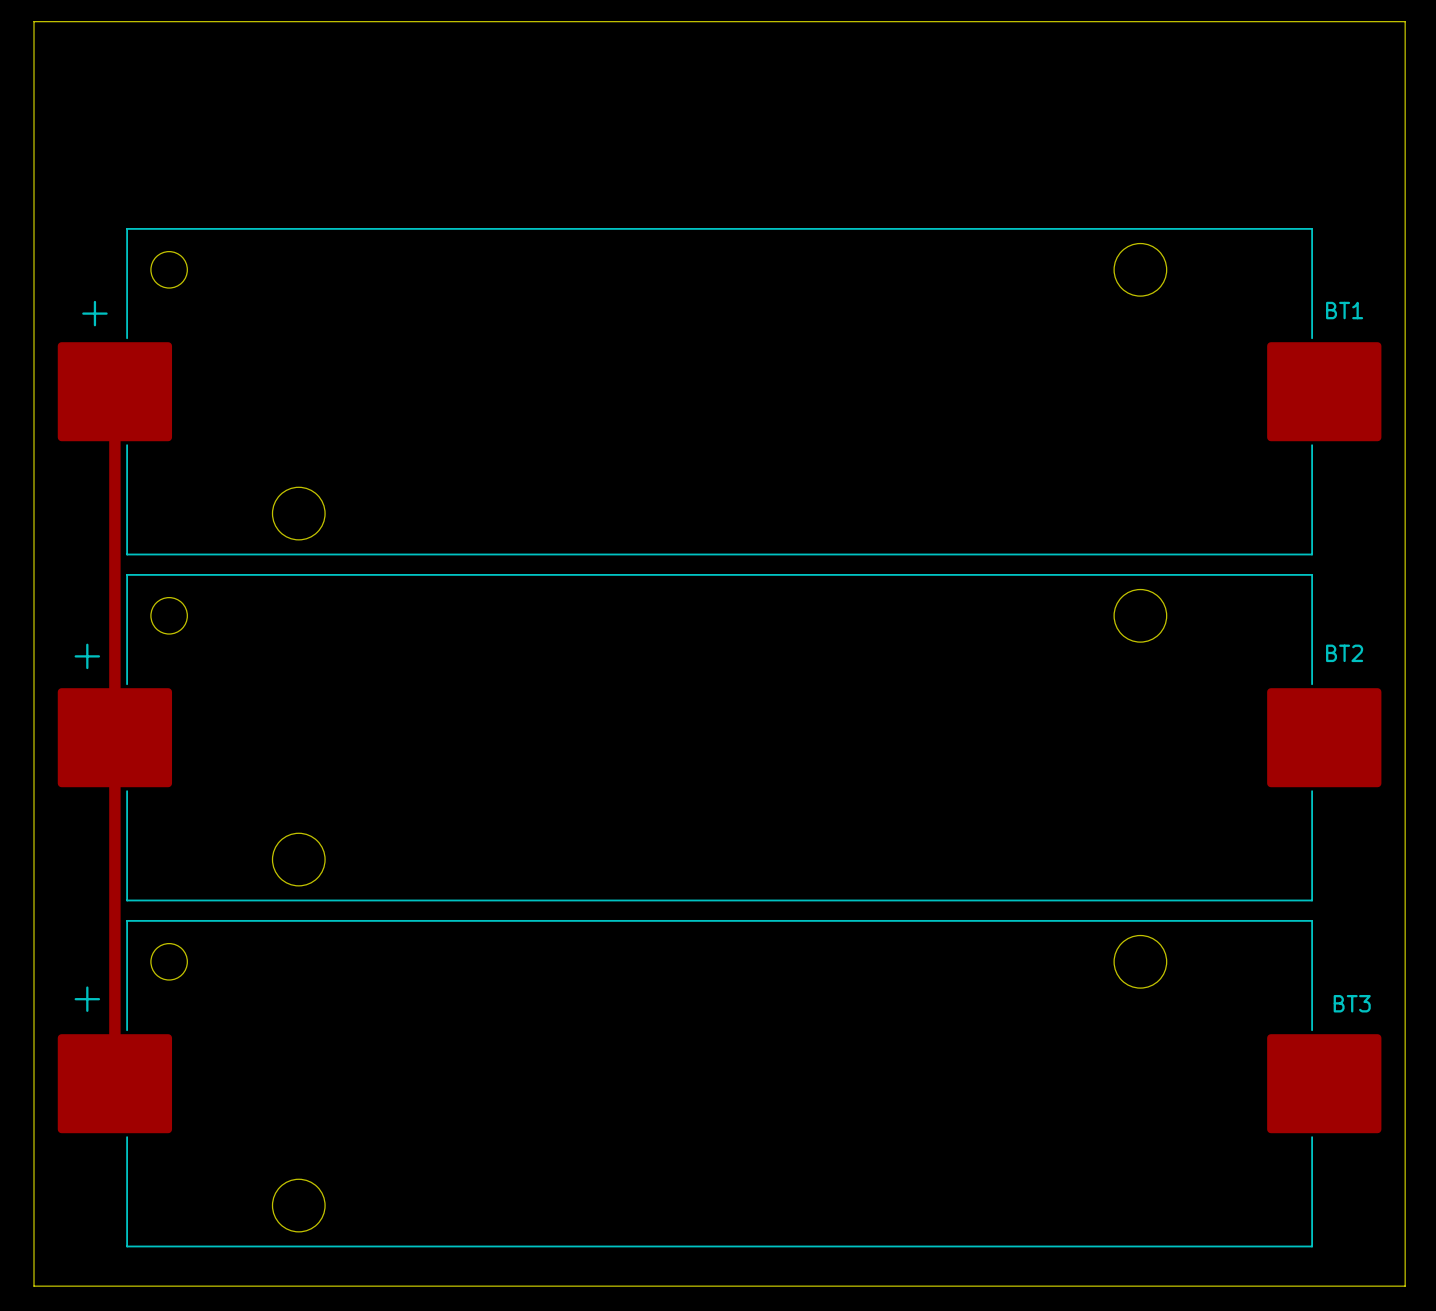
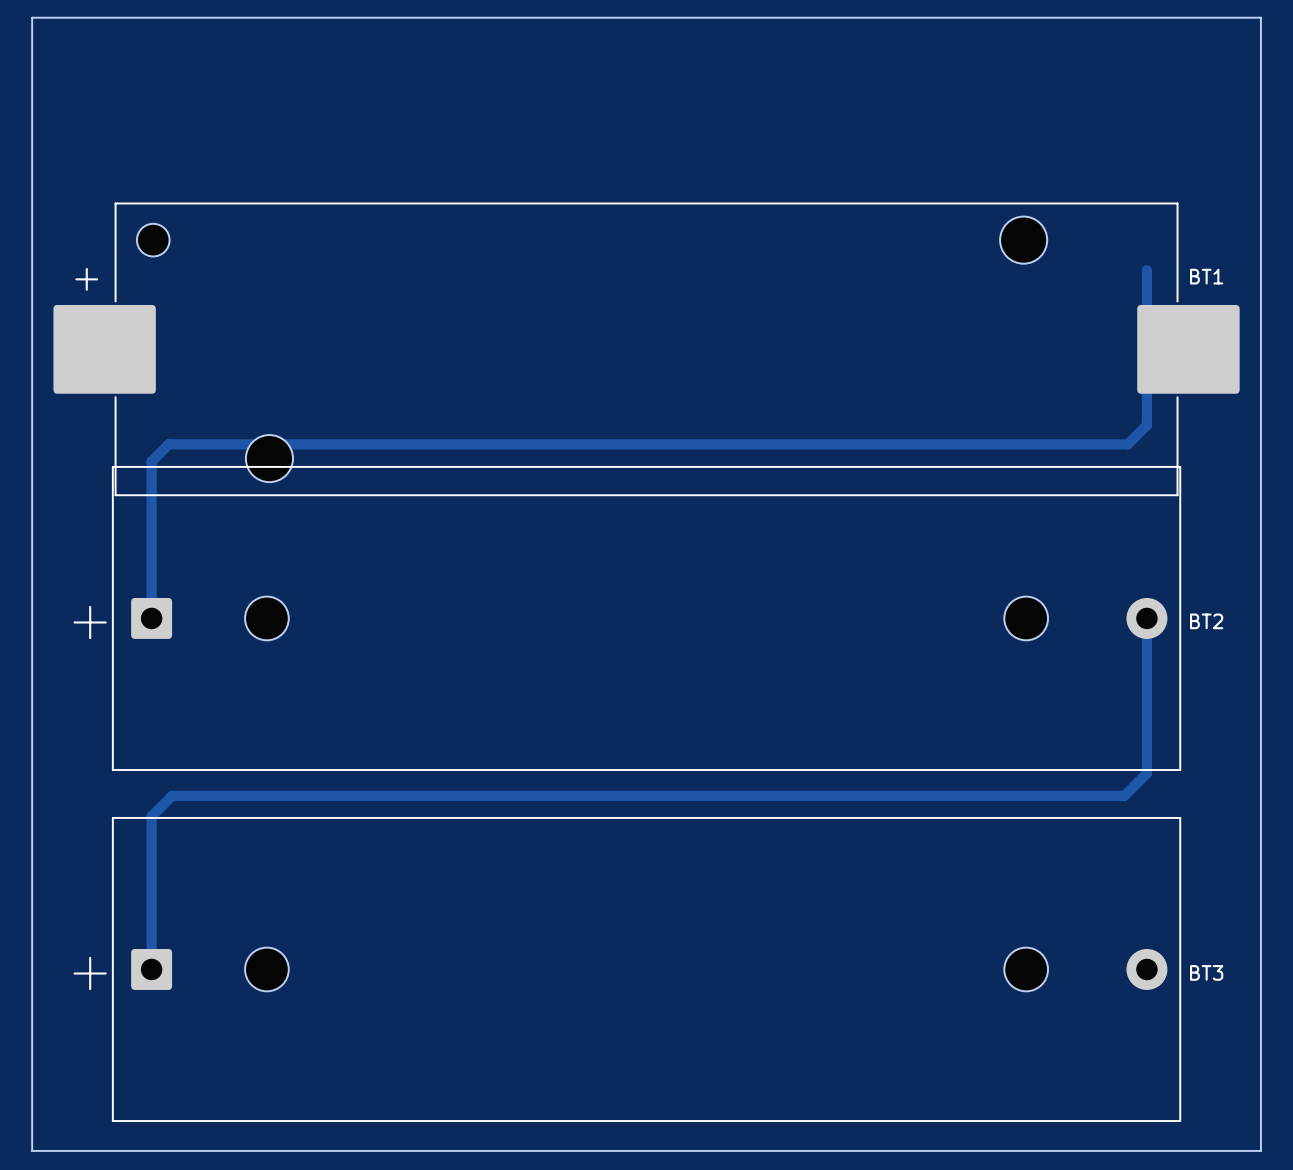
track: none -> (1146, 270) (1146, 425) (1127, 444) (168, 444) (151, 461) (151, 618)
track: (114, 391) (114, 1083) -> none
BT2 footprint: [57, 573, 1382, 902] -> [112, 466, 1182, 771]
BT2 name position: BT2 (1344, 653) -> BT2 (1206, 621)
track: none -> (1146, 618) (1146, 773) (1124, 795) (172, 795) (151, 816) (151, 969)
BT3 footprint: [57, 919, 1382, 1248] -> [112, 817, 1182, 1122]
BT3 name position: BT3 (1352, 1003) -> BT3 (1206, 972)

